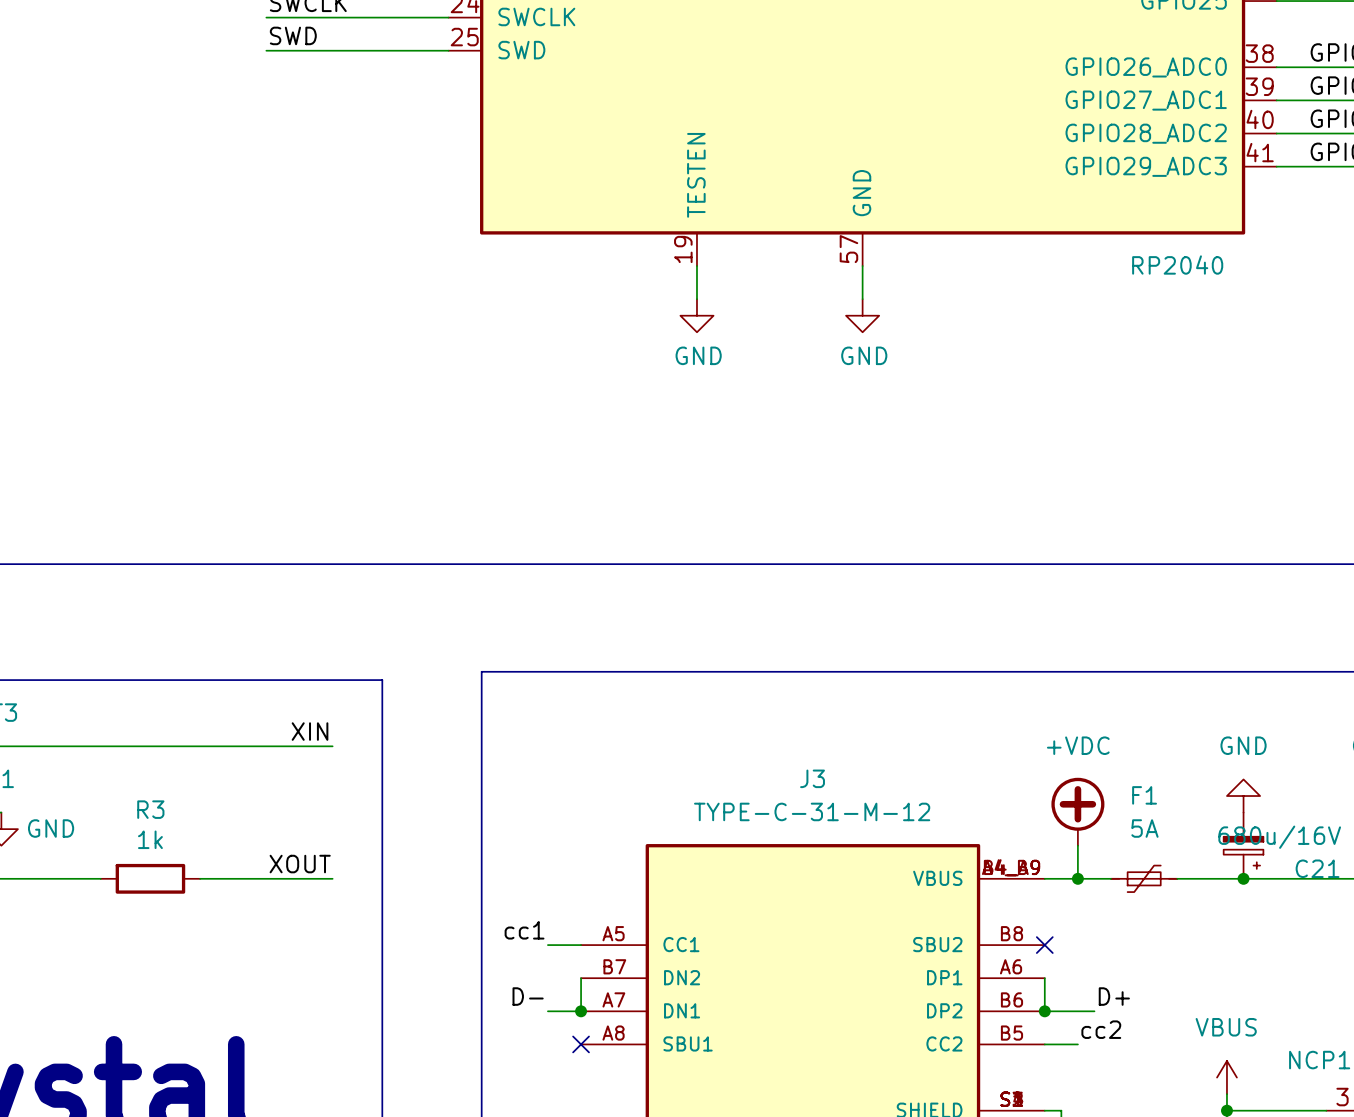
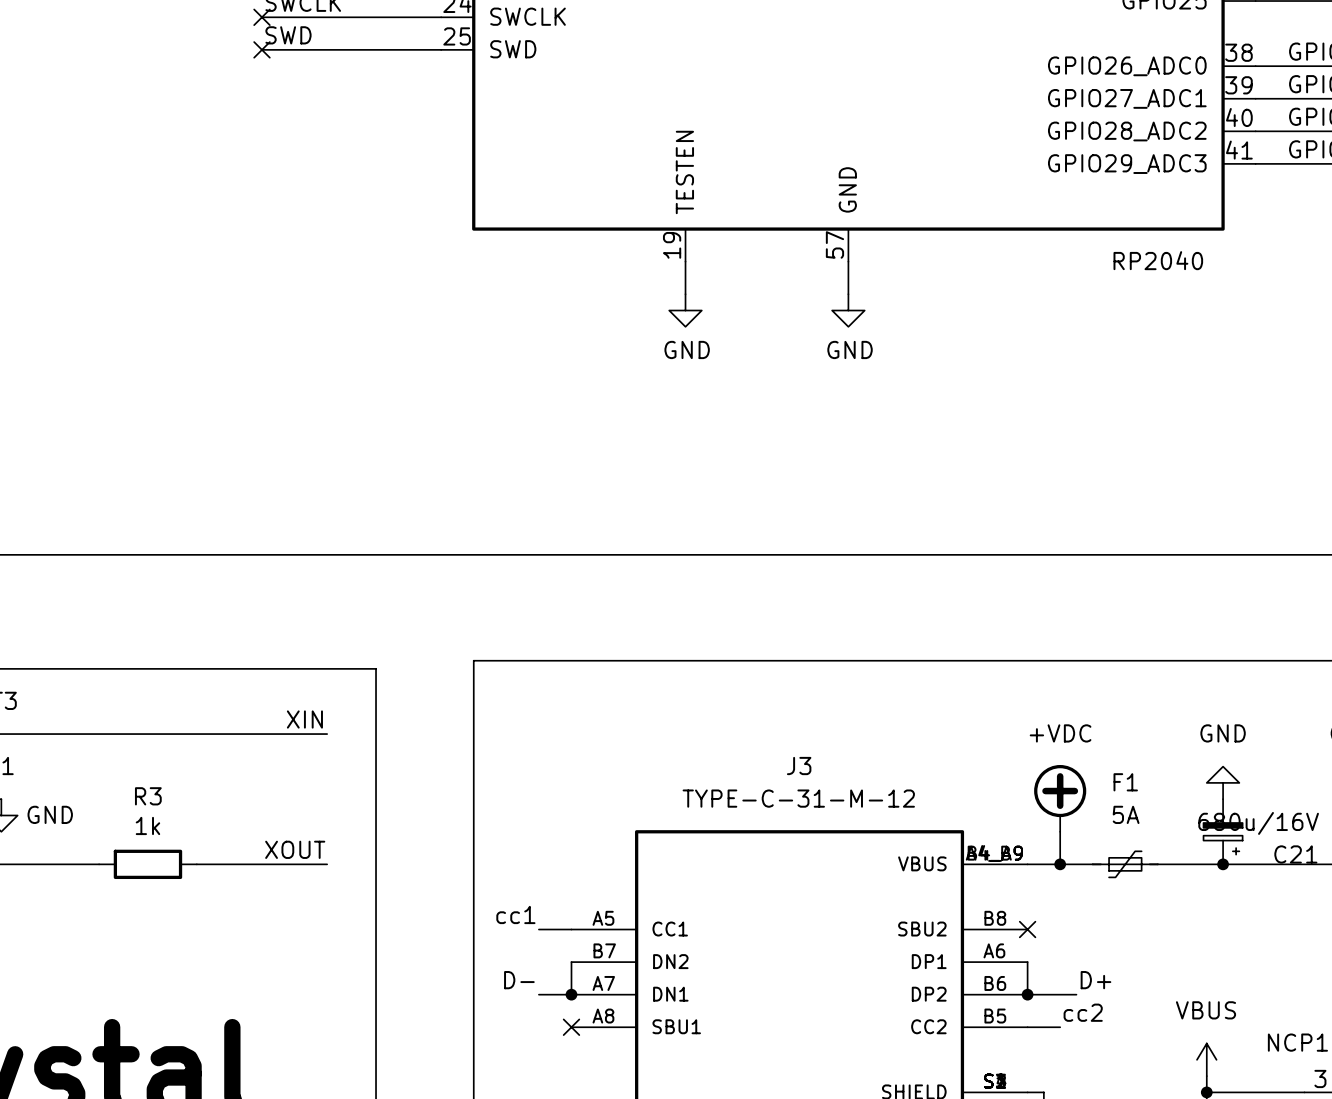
no-connect mark: none -> (261, 17)
no-connect mark: none -> (261, 49)

